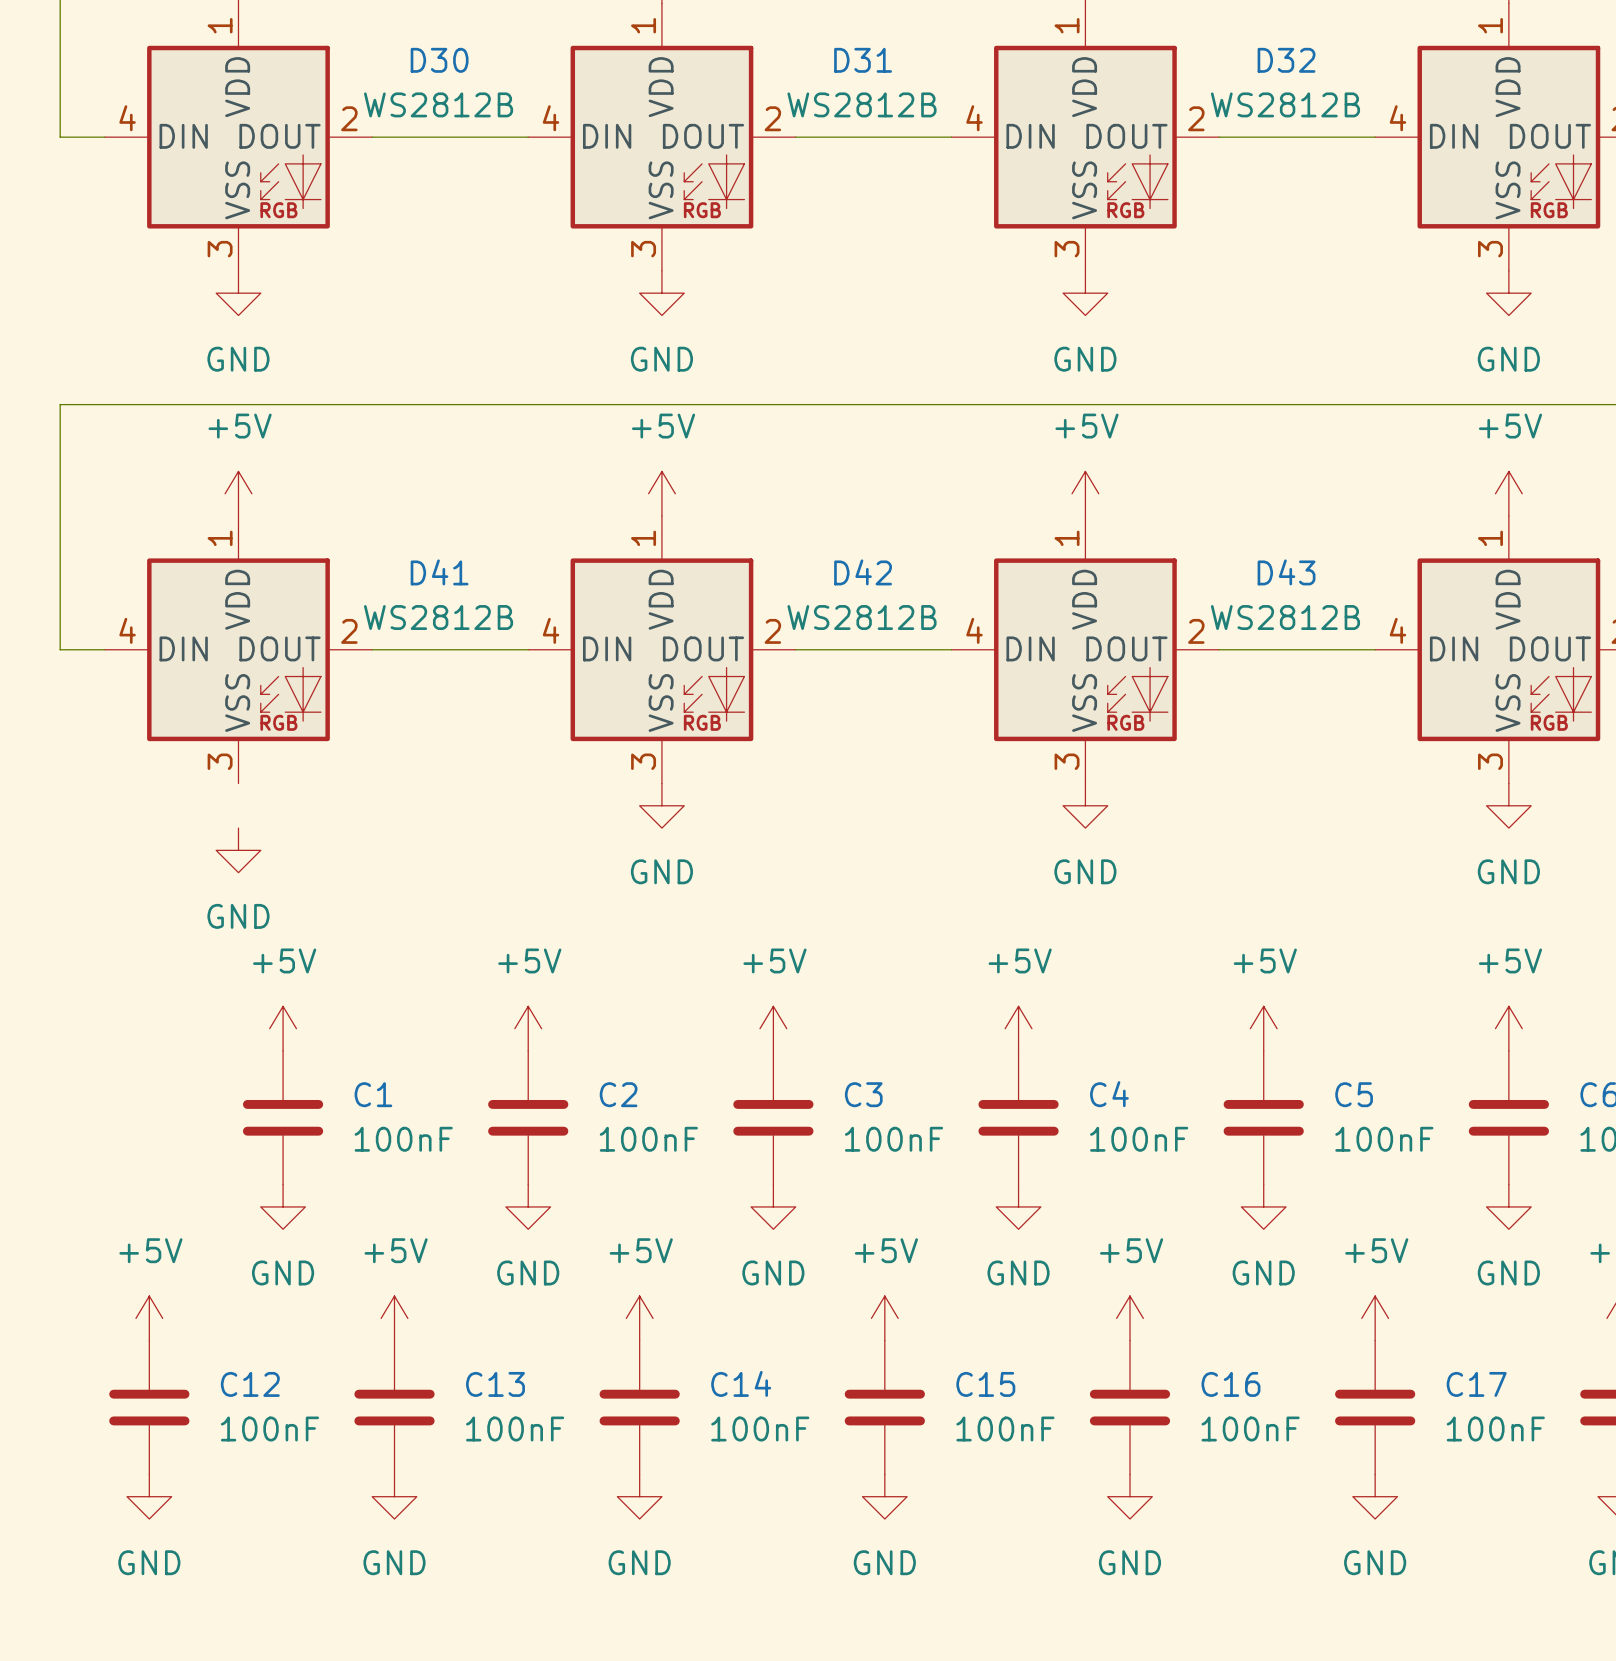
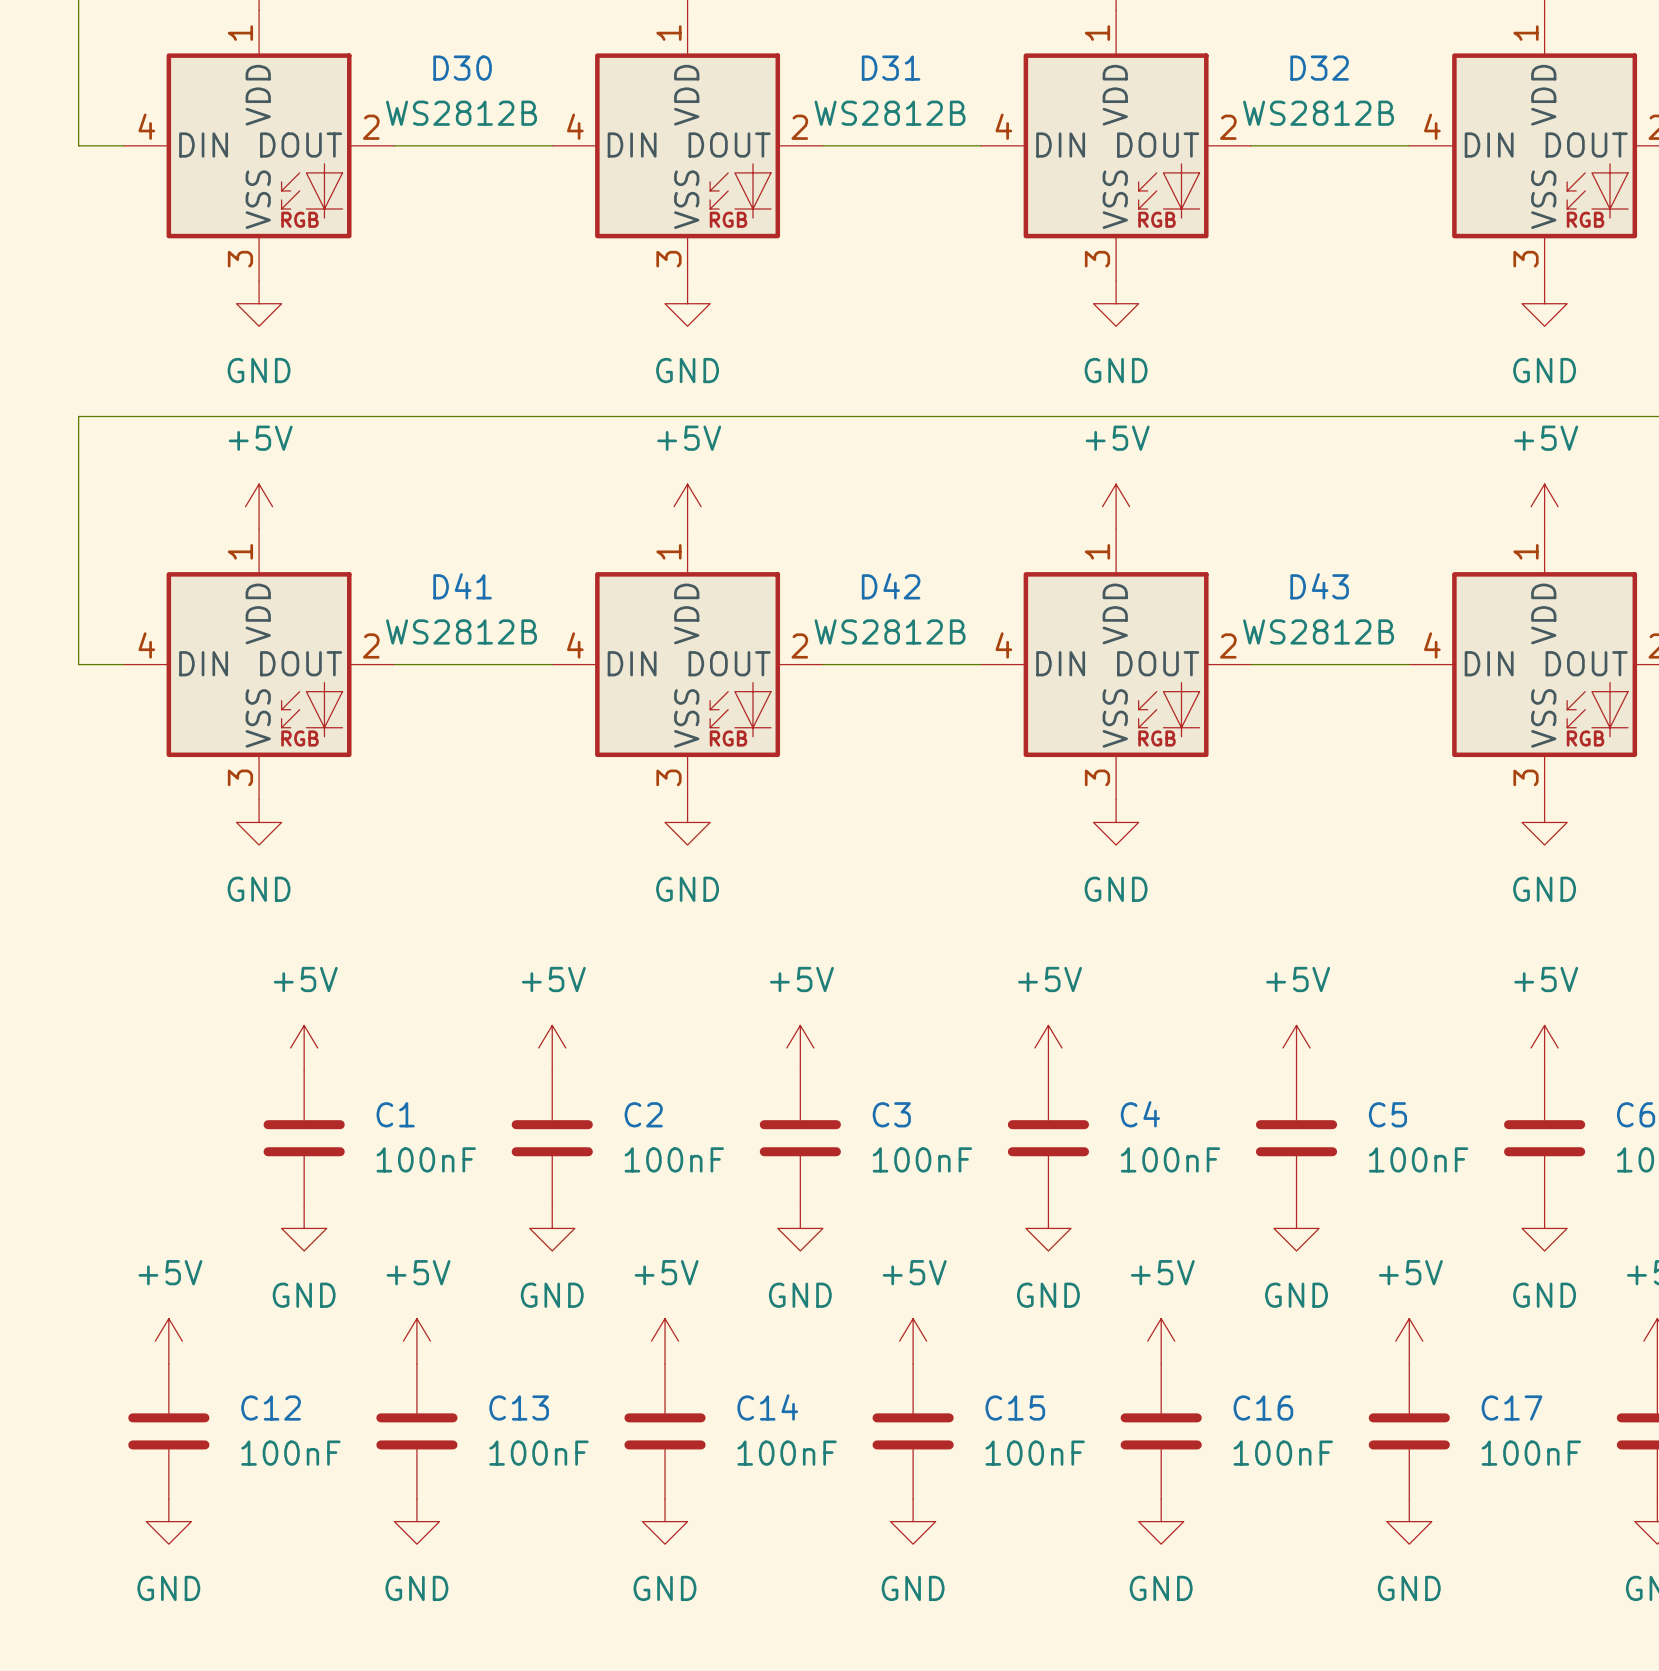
power symbol position: GND (238, 850) -> GND (259, 822)

